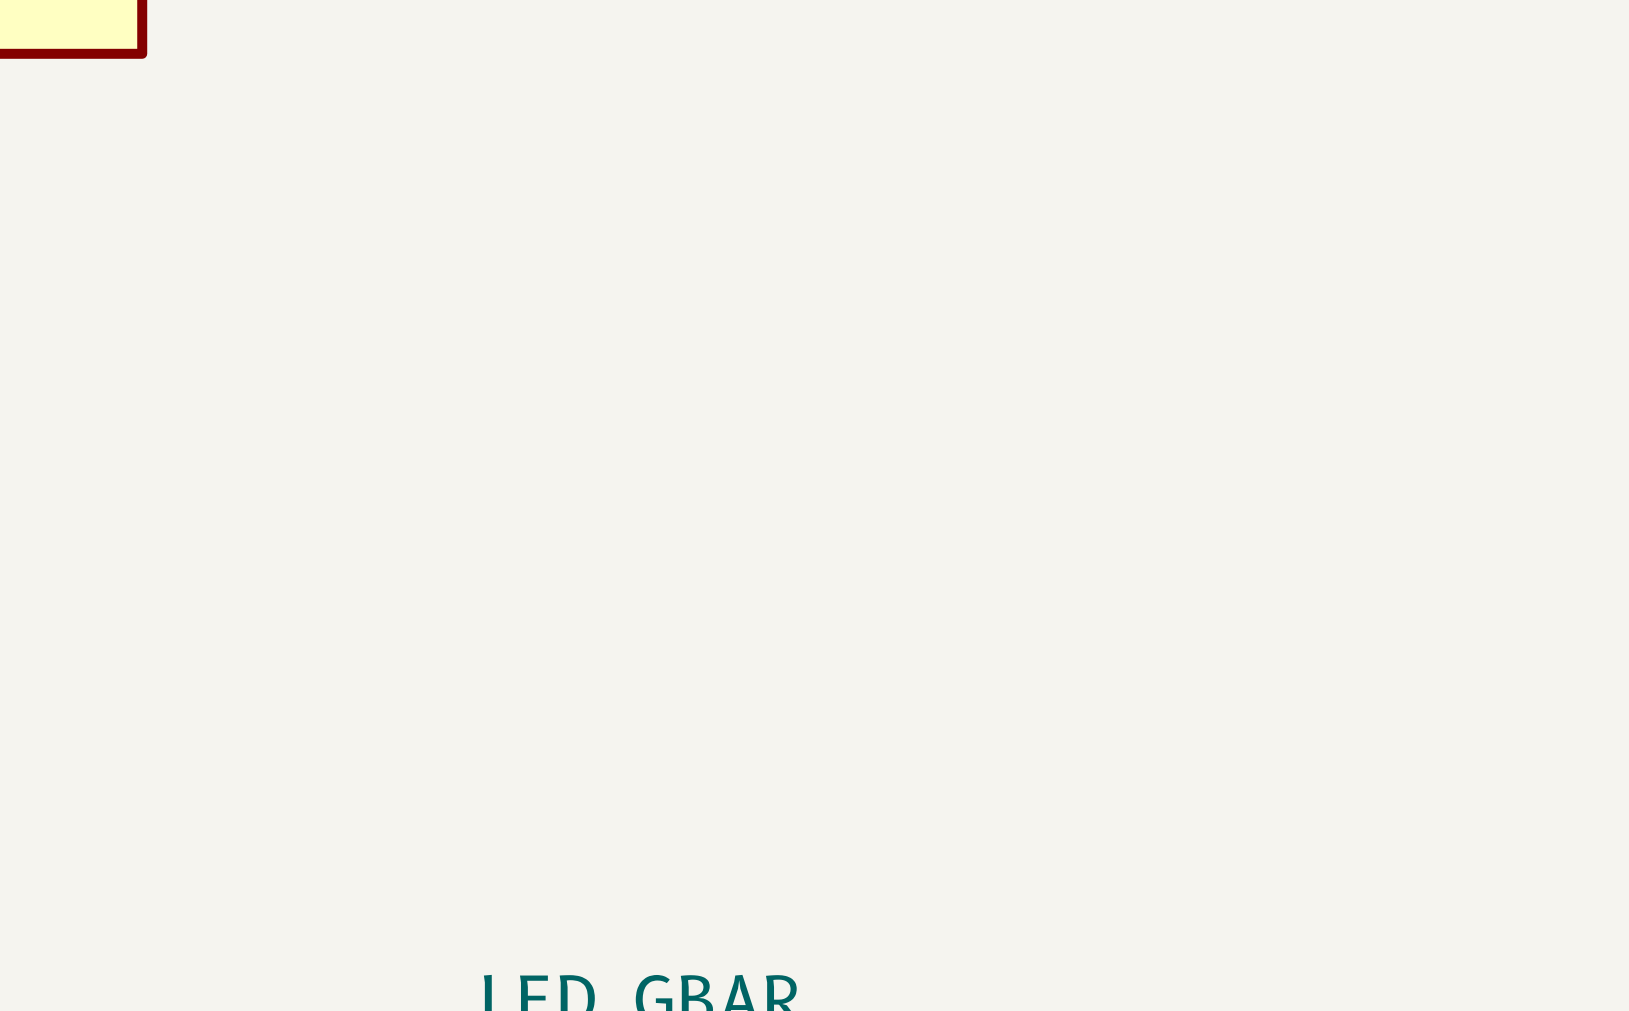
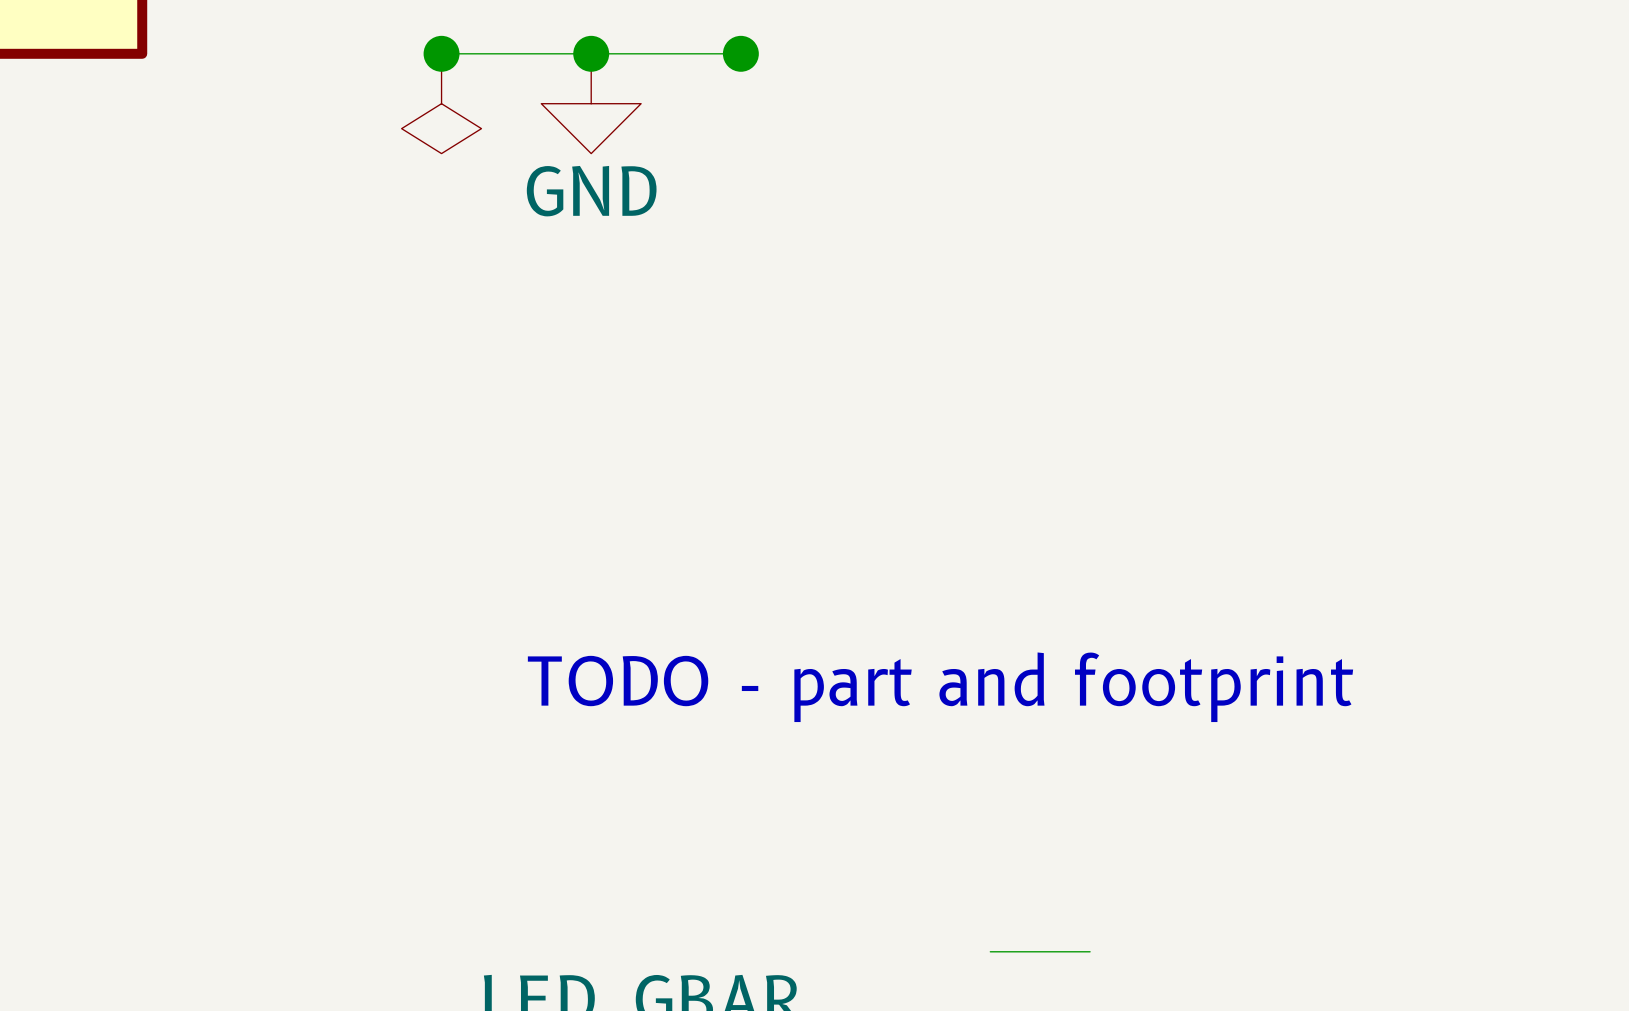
wire: none -> (441, 53) (740, 53)
junction: none -> (441, 53)
junction: none -> (591, 53)
junction: none -> (740, 53)
power symbol: none -> (441, 103)
power symbol: none -> GND (591, 103)
text: none -> TODO - part and footprint (940, 687)
wire: none -> (990, 951) (1090, 951)

